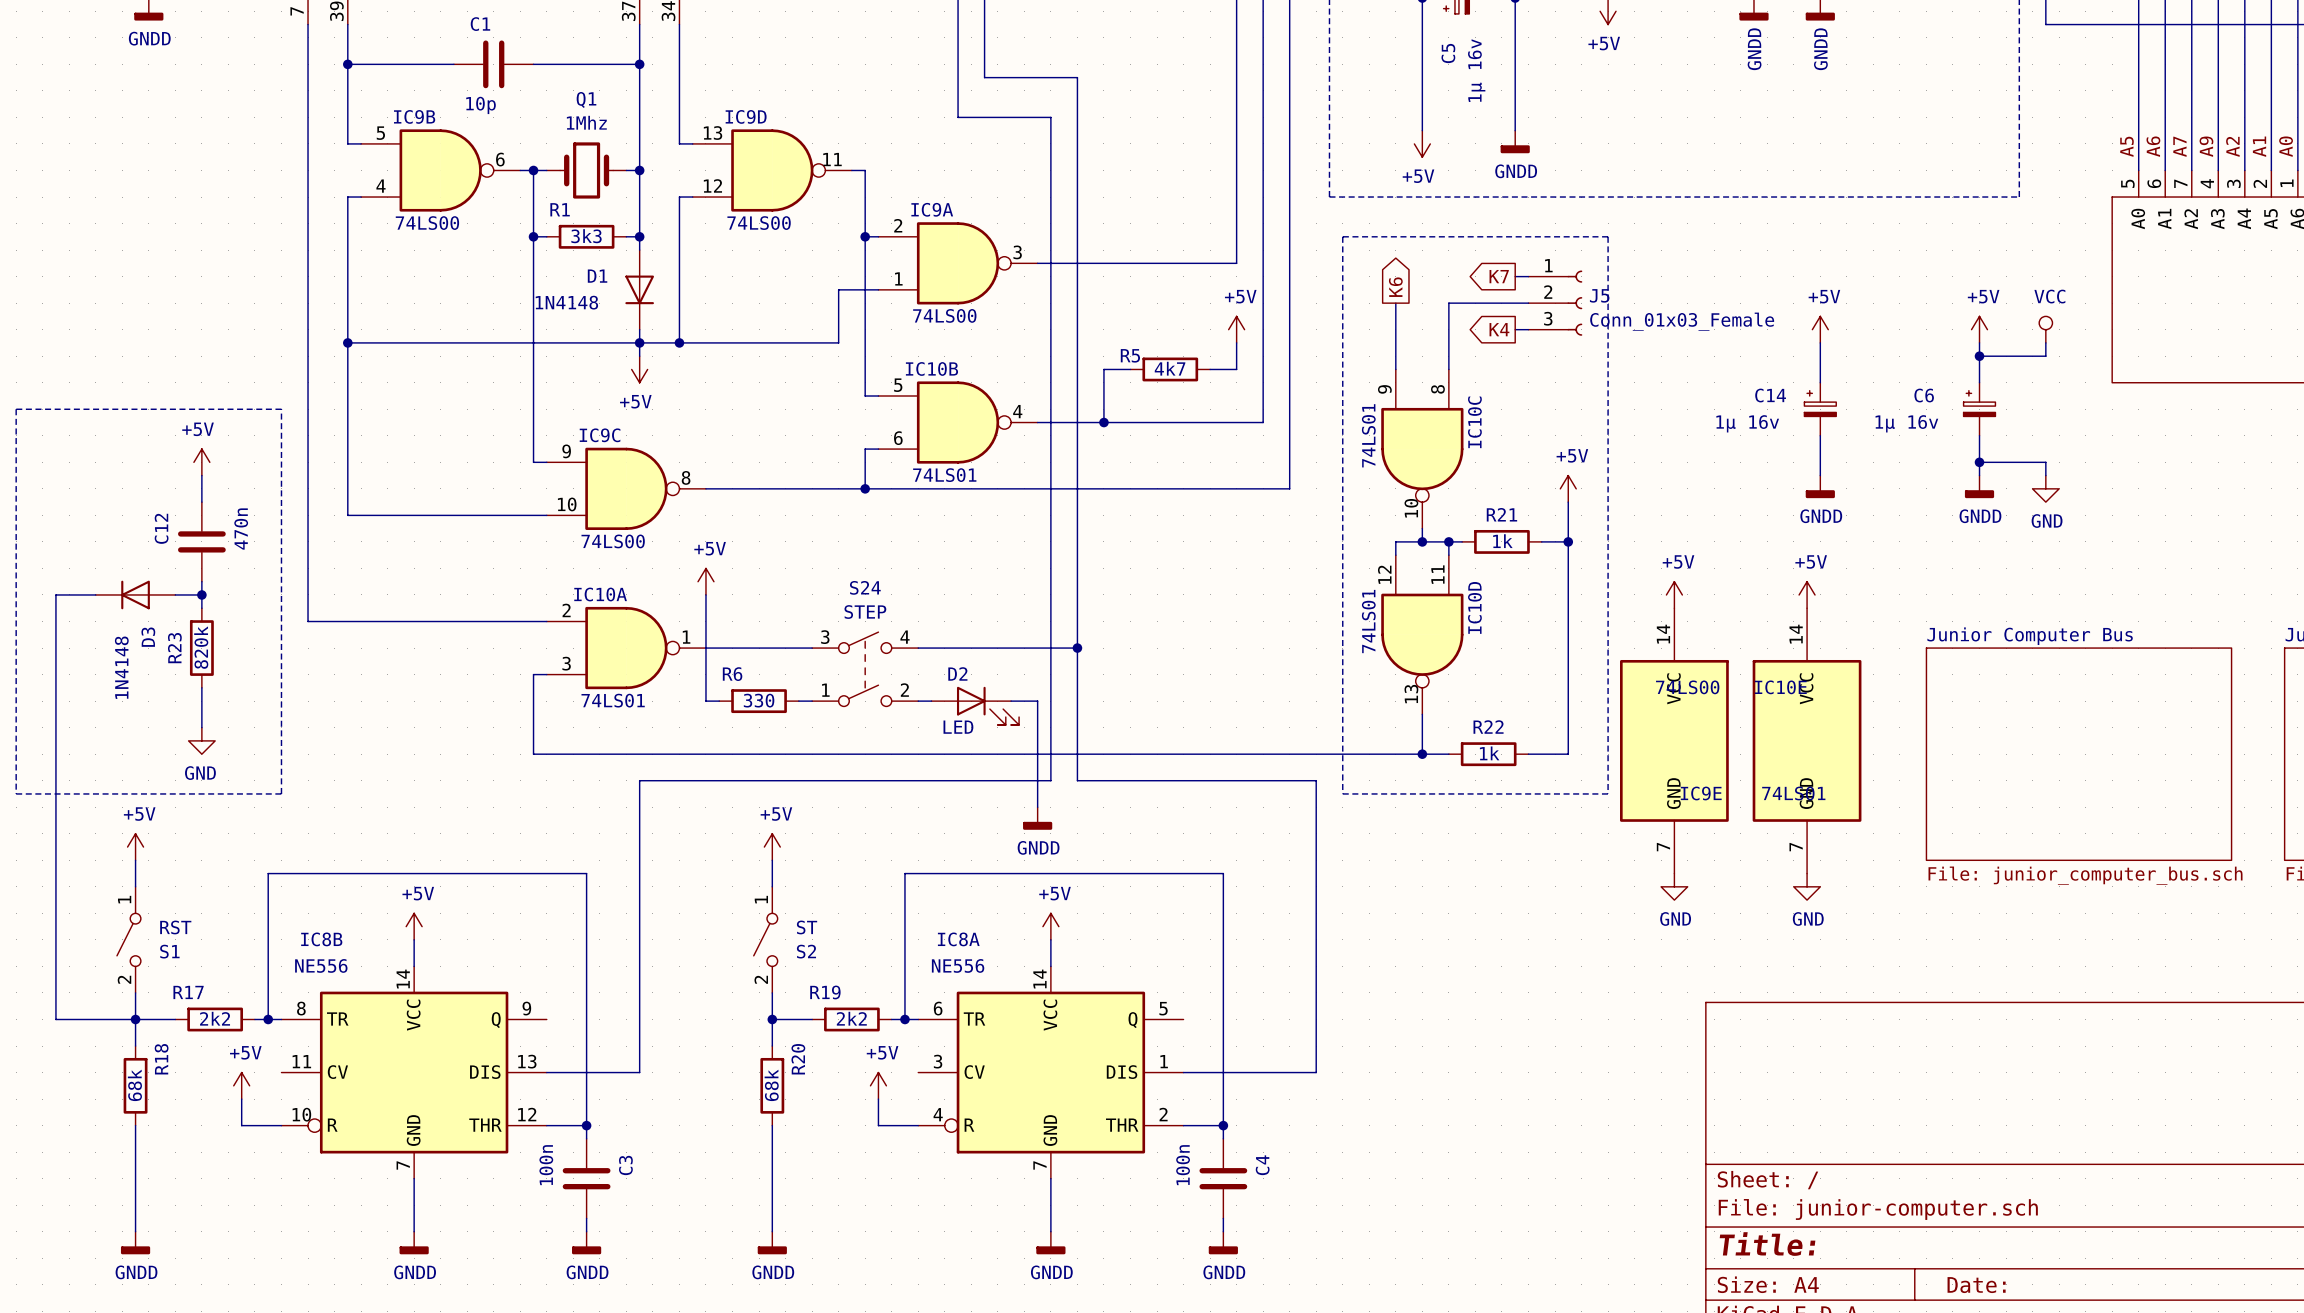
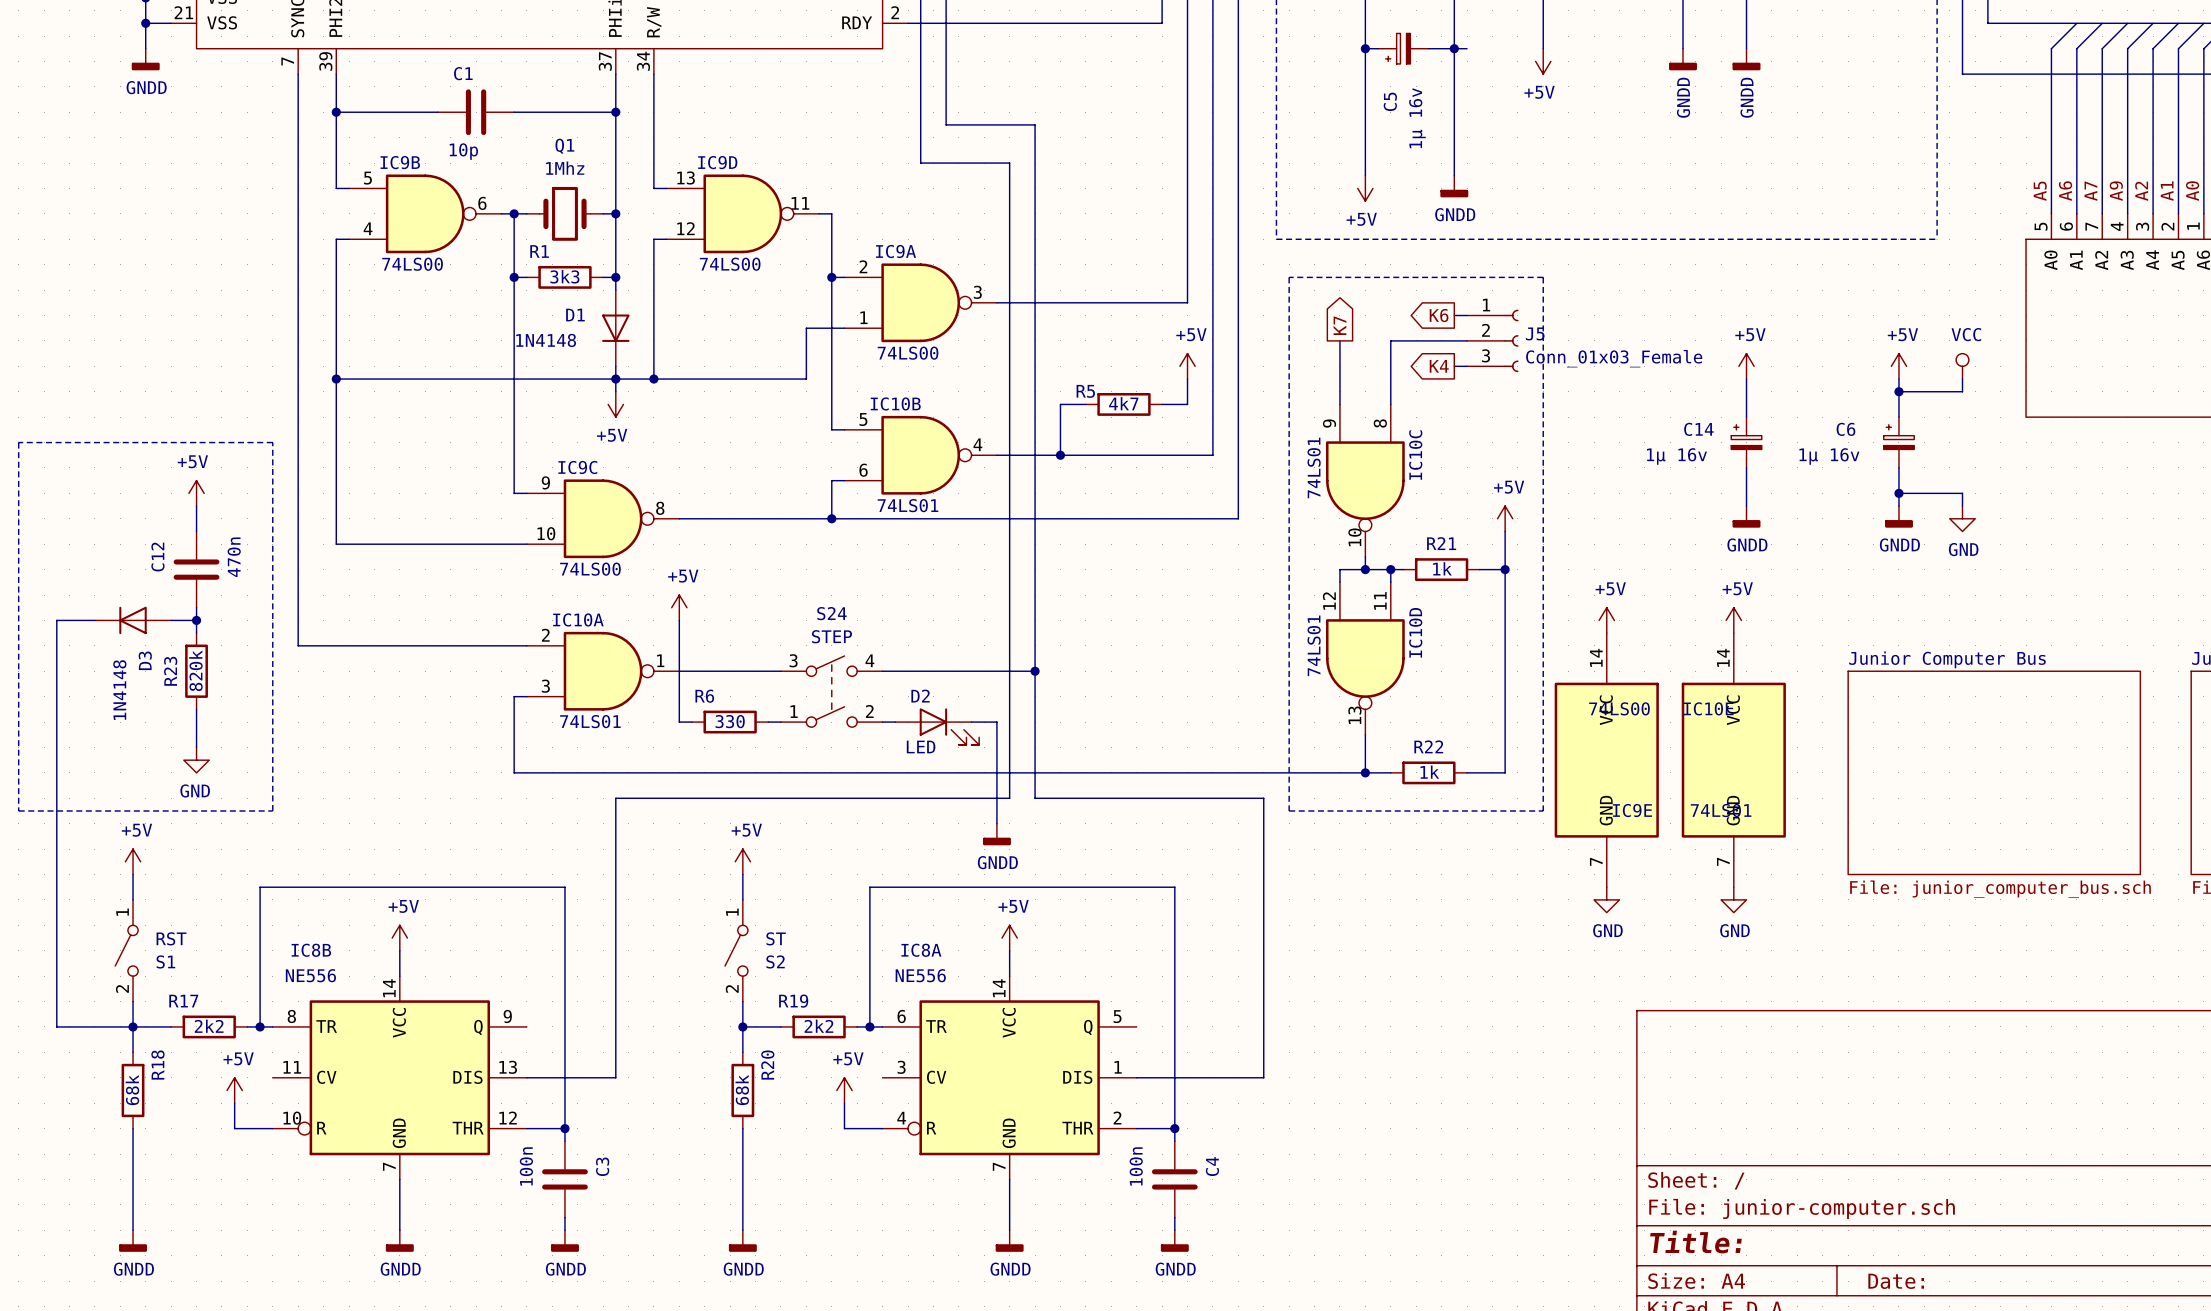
global label: K7 (1499, 276) -> K6 (1439, 315)
global label: K6 (1395, 287) -> K7 (1339, 325)

